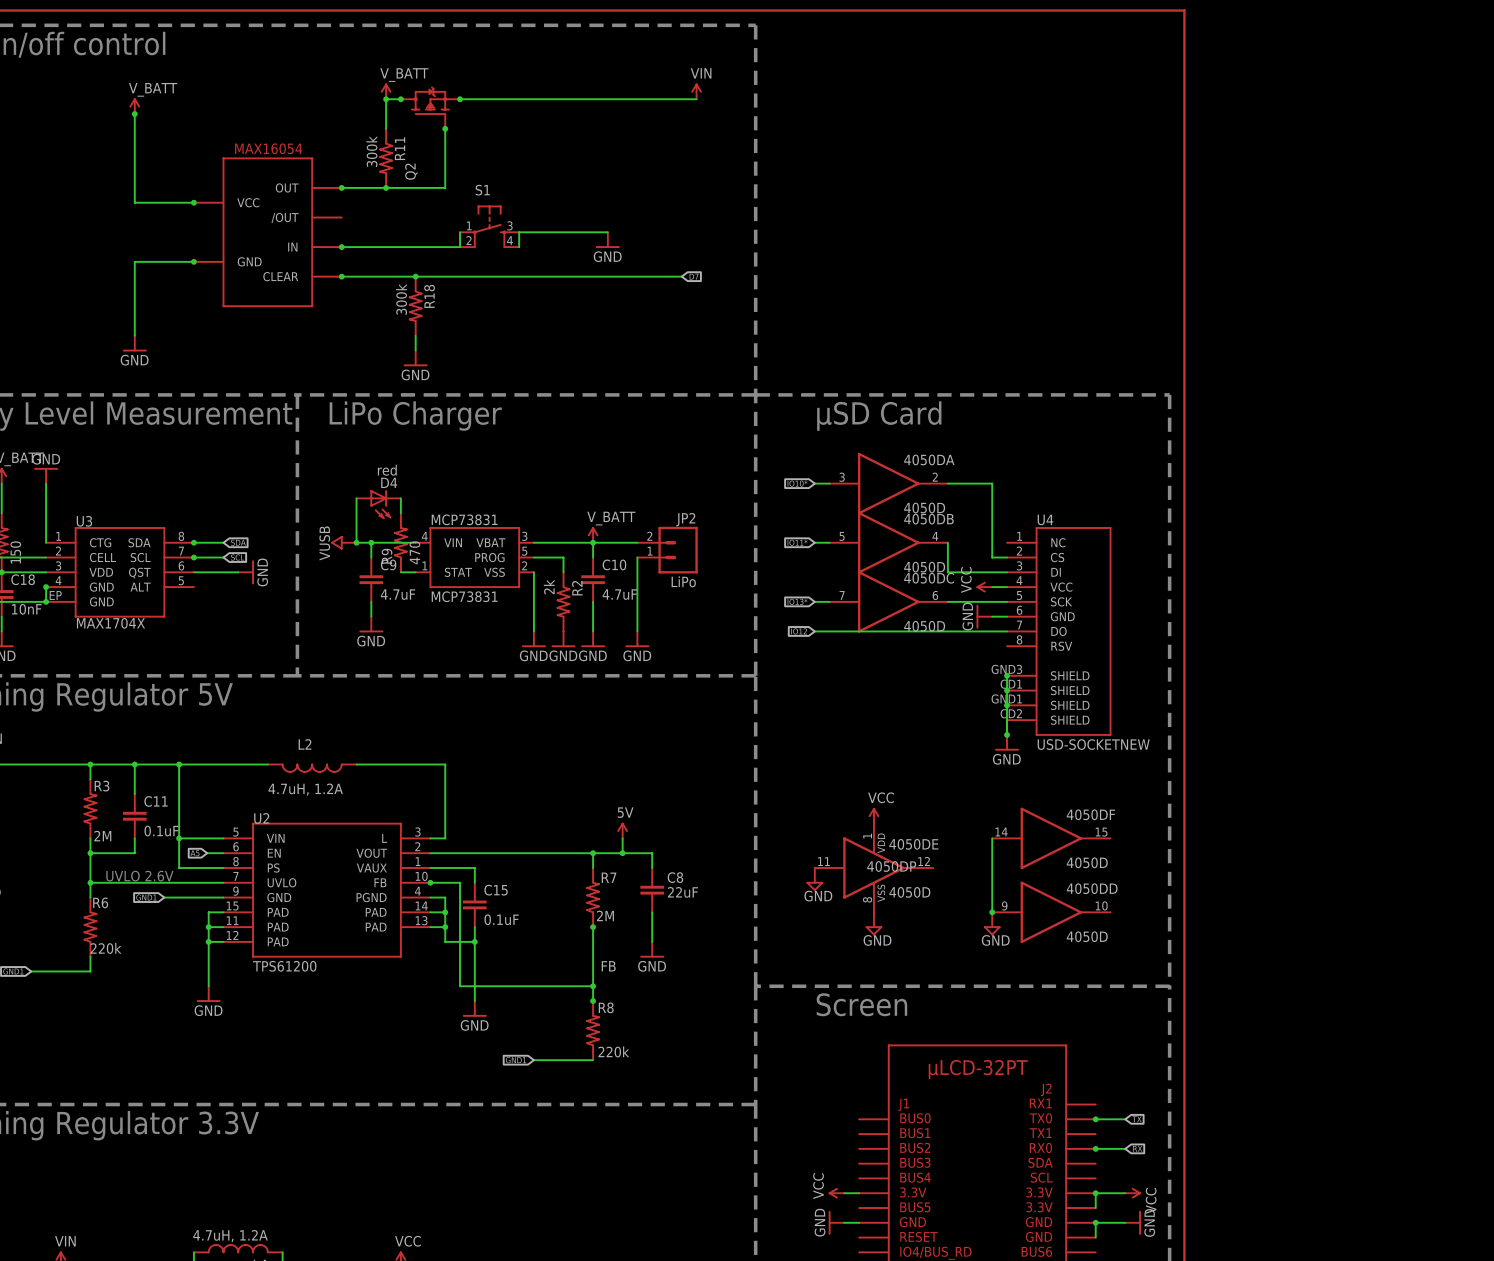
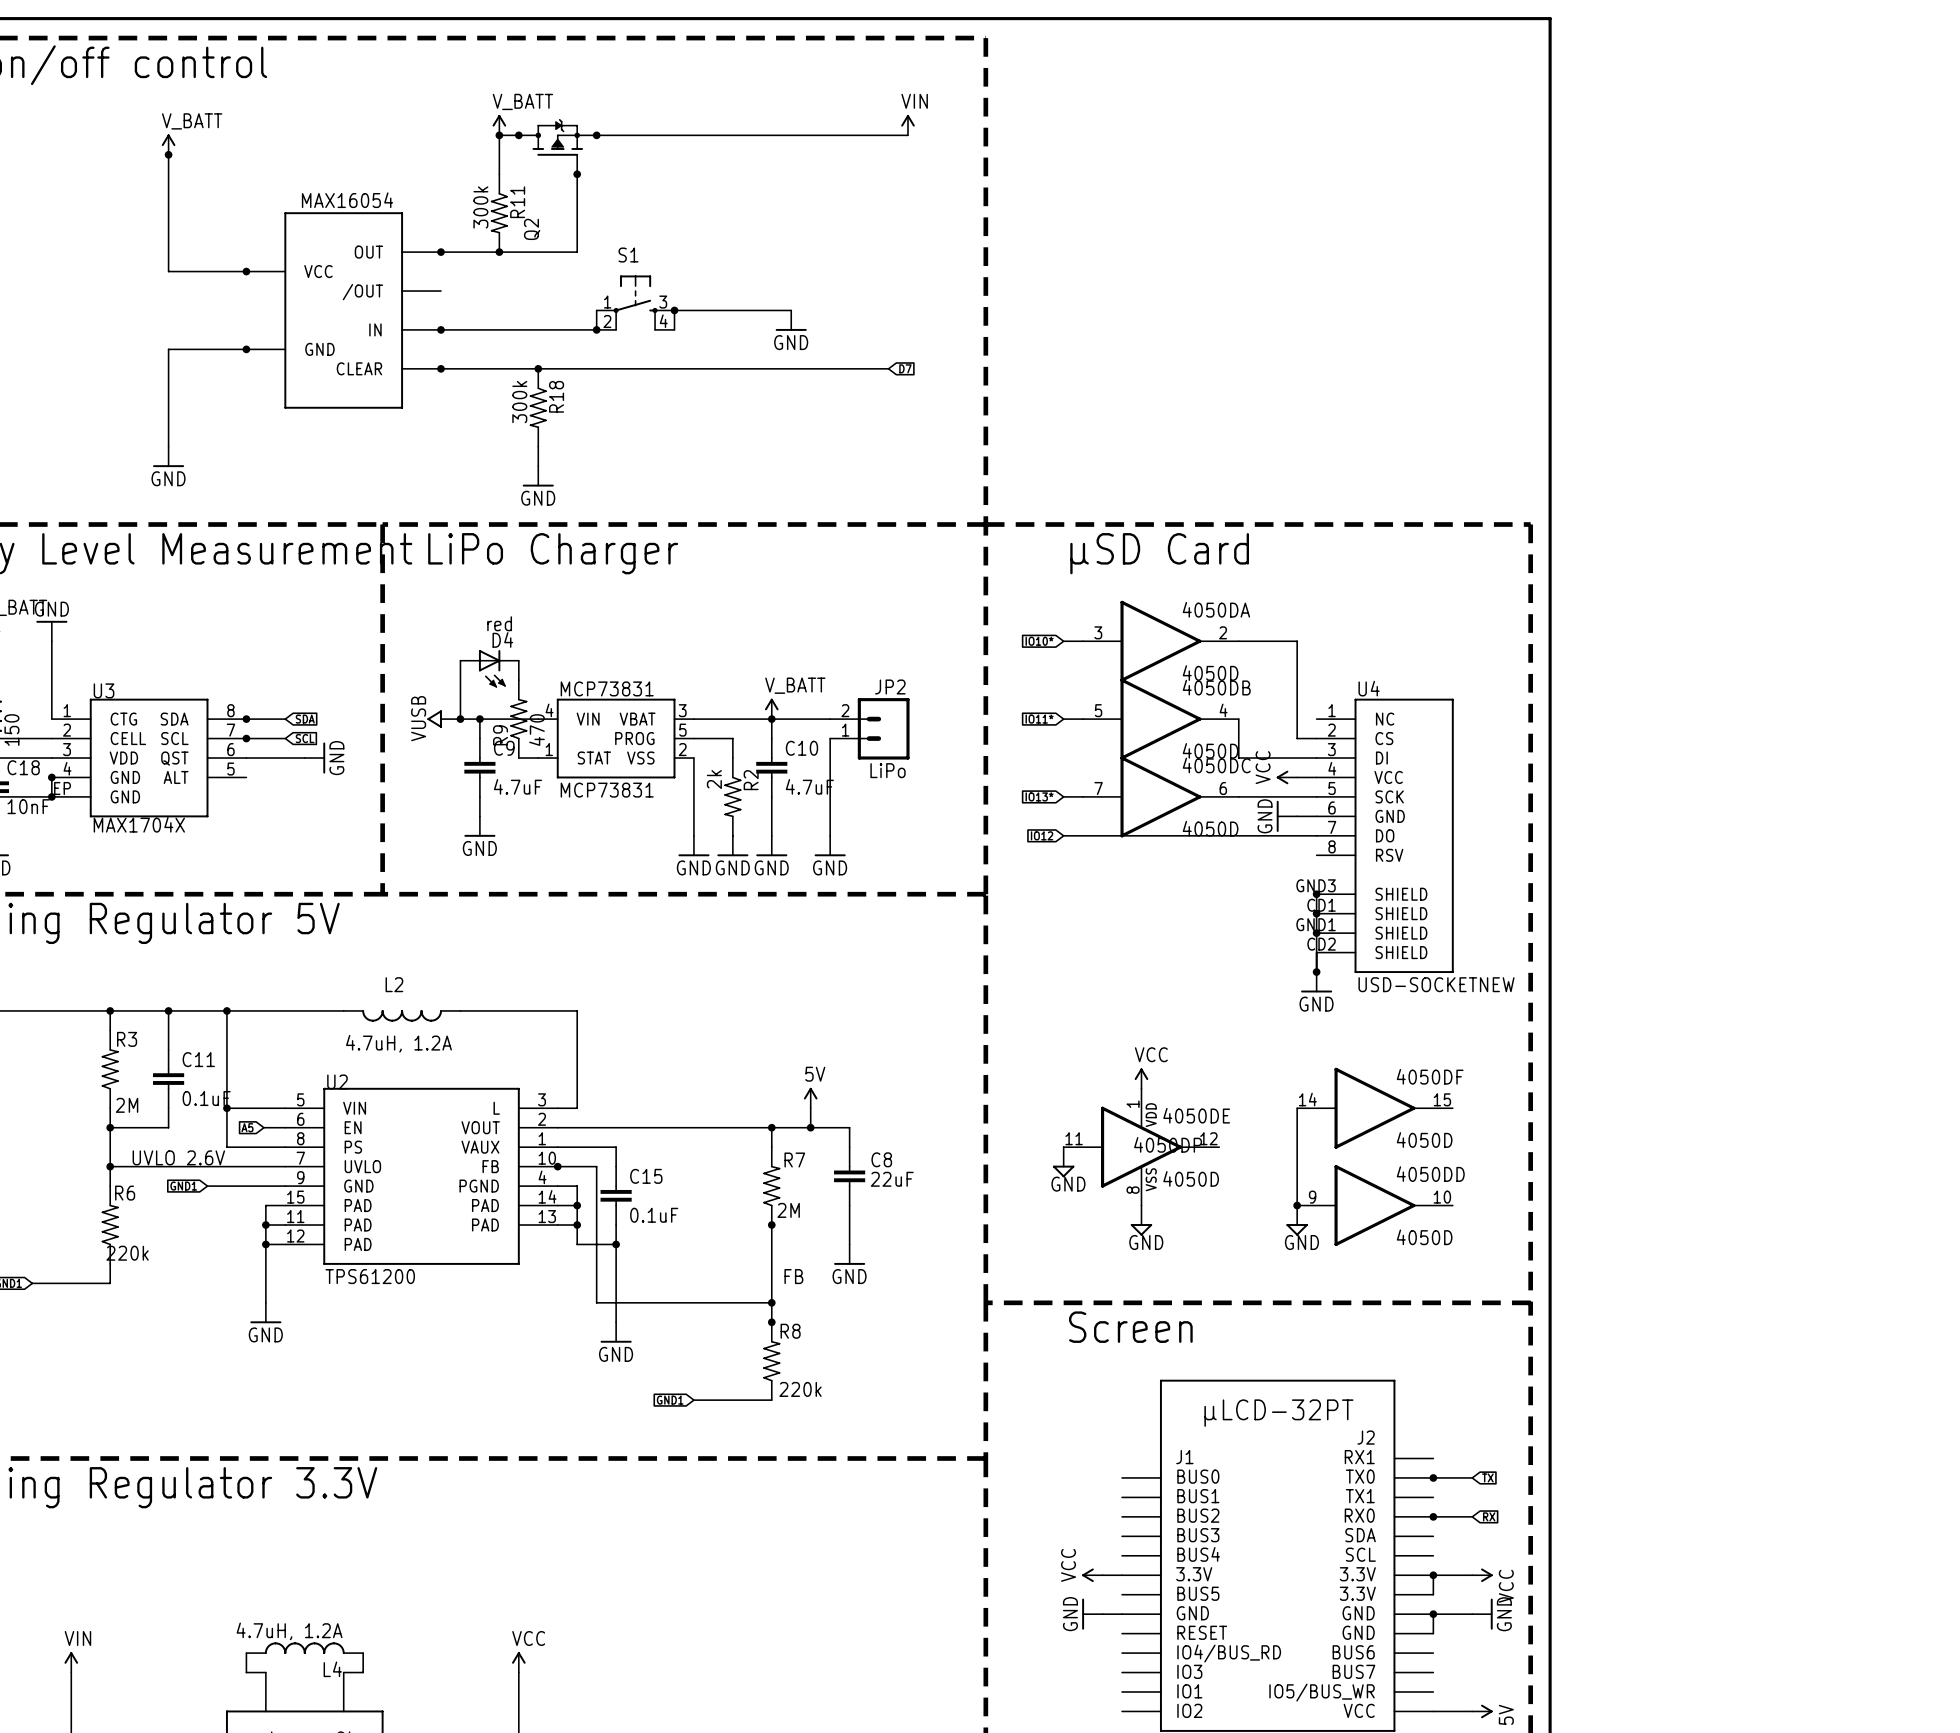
junction: none -> (674, 310)
junction: none -> (596, 329)

